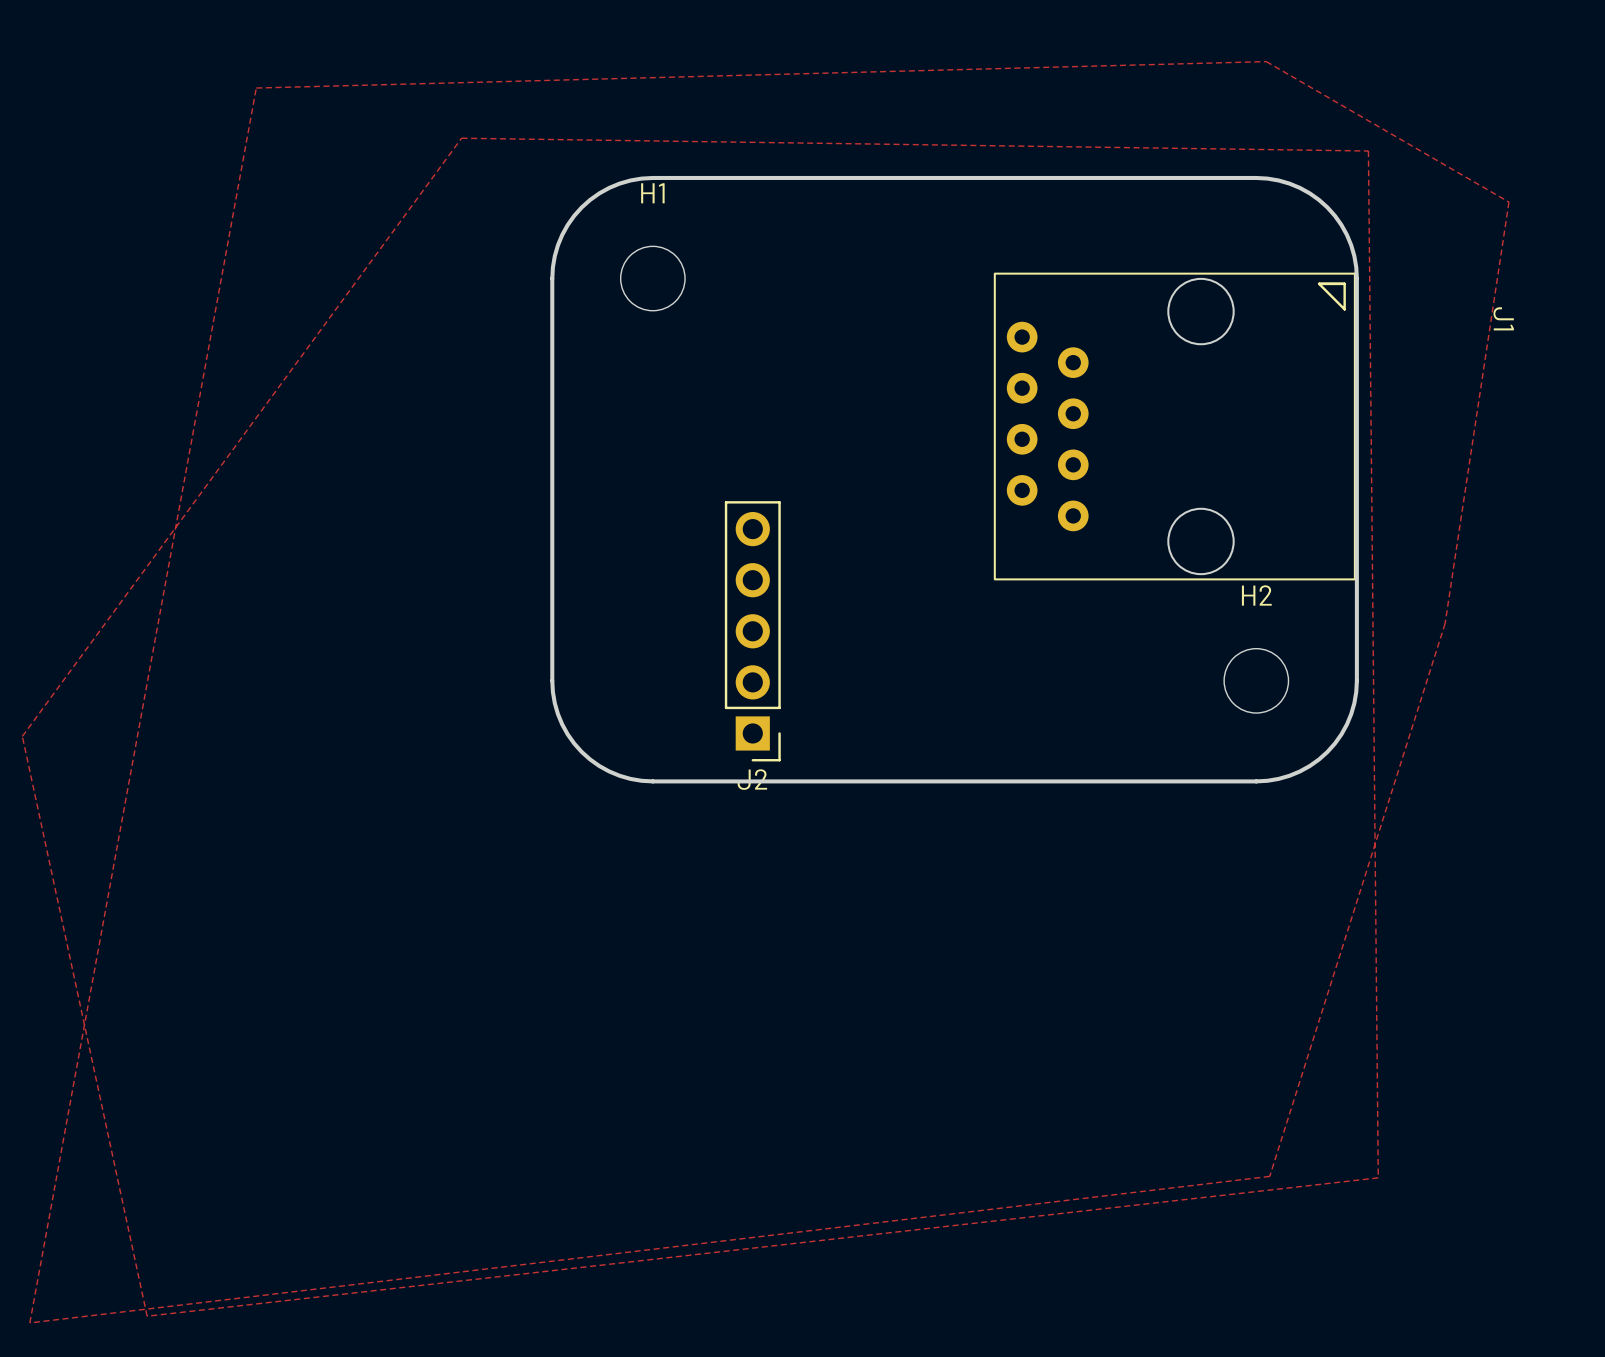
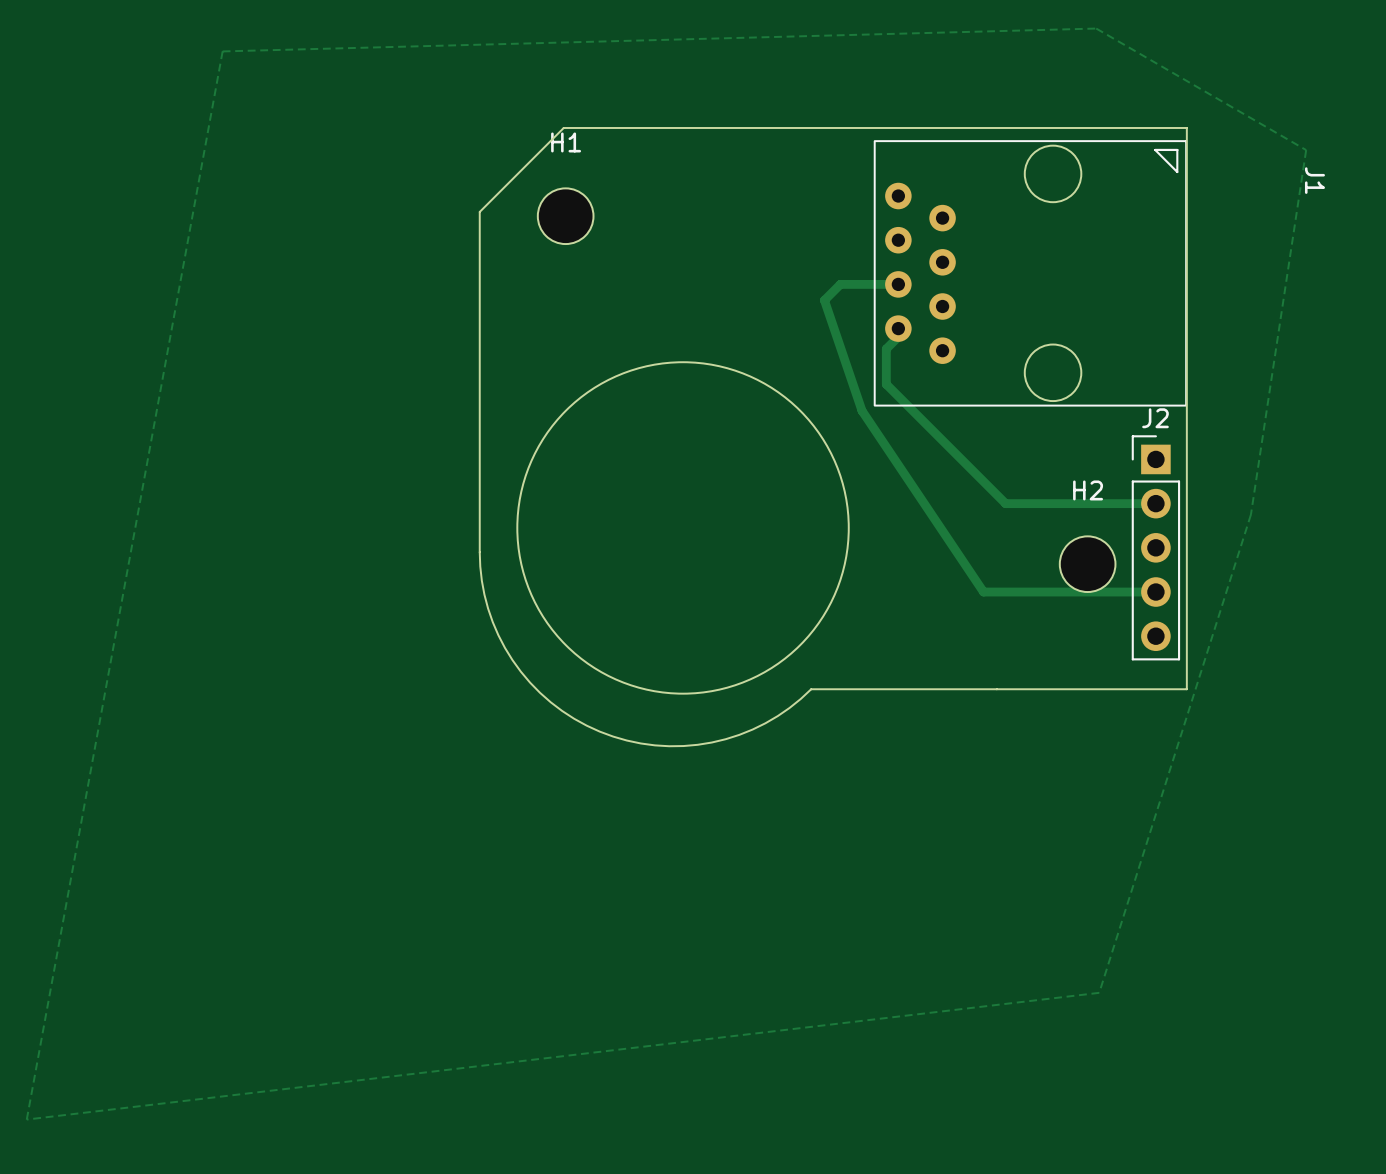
zone outline: (461, 138) (22, 736) (147, 1316) (1378, 1177) (1368, 151) (461, 138) -> none
board edge: (652, 177) (1256, 177) (1289, 183) (1319, 199) (1334, 215) (1346, 234) (1354, 256) (1356, 278) (1356, 680) (1351, 714) (1334, 743) (1319, 759) (1299, 771) (1278, 778) (1256, 781) (652, 781) (619, 775) (590, 759) (574, 743) (562, 724) (552, 692) (552, 267) (557, 245) (567, 225) (590, 199) (619, 183) (652, 177) -> (563, 127) (479, 211) (479, 552) (481, 580) (488, 608) (498, 635) (512, 660) (540, 692) (562, 710) (599, 731) (626, 740) (669, 746) (711, 742) (752, 729) (777, 716) (811, 689) (1186, 689) (1186, 127) (563, 127)
track: none -> (898, 284) (840, 284) (824, 300) (862, 410) (983, 592) (1155, 592)
track: none -> (898, 328) (898, 336) (886, 348) (886, 384) (1005, 503) (1155, 503)
J1 position: (1174, 426) -> (1030, 273)
round board edge: none -> [516, 361, 850, 695]
J2 rotation: 0° (752, 631) -> 180° (1155, 547)
J2 position: (752, 631) -> (1155, 547)

